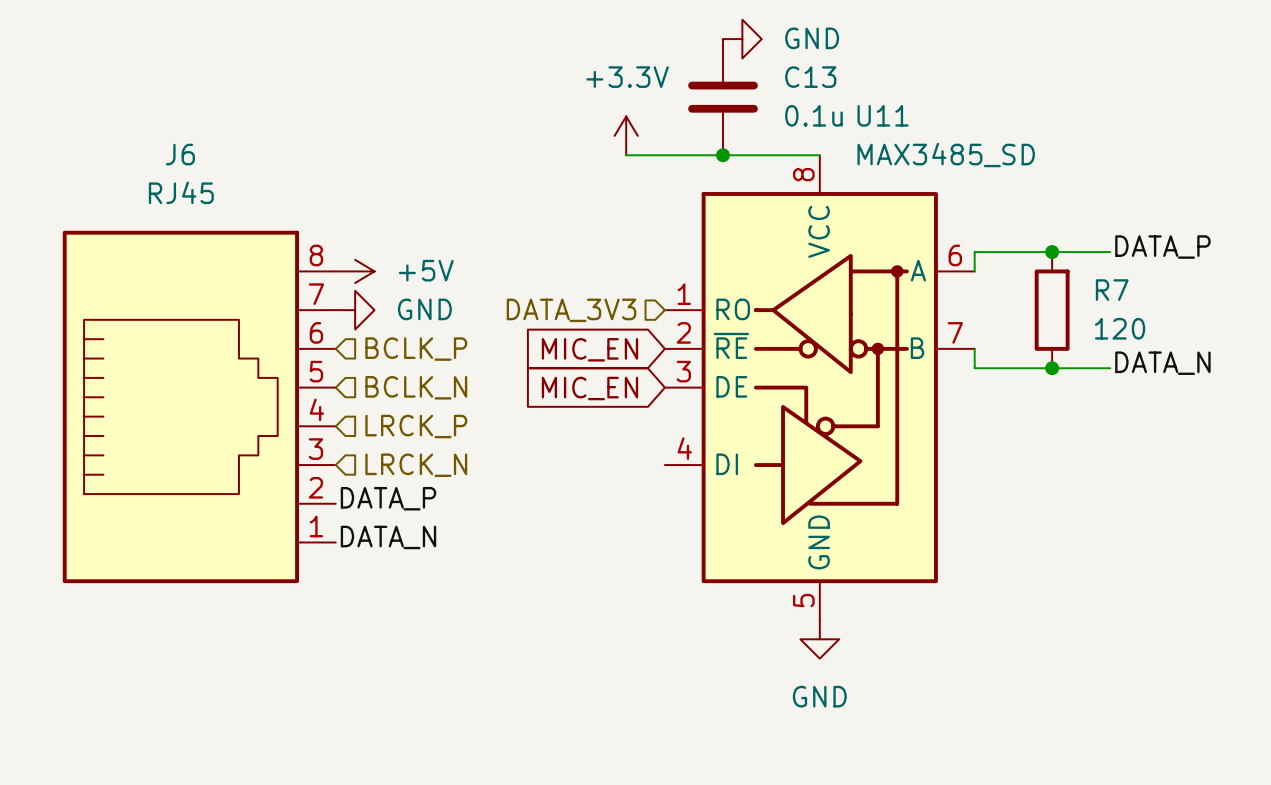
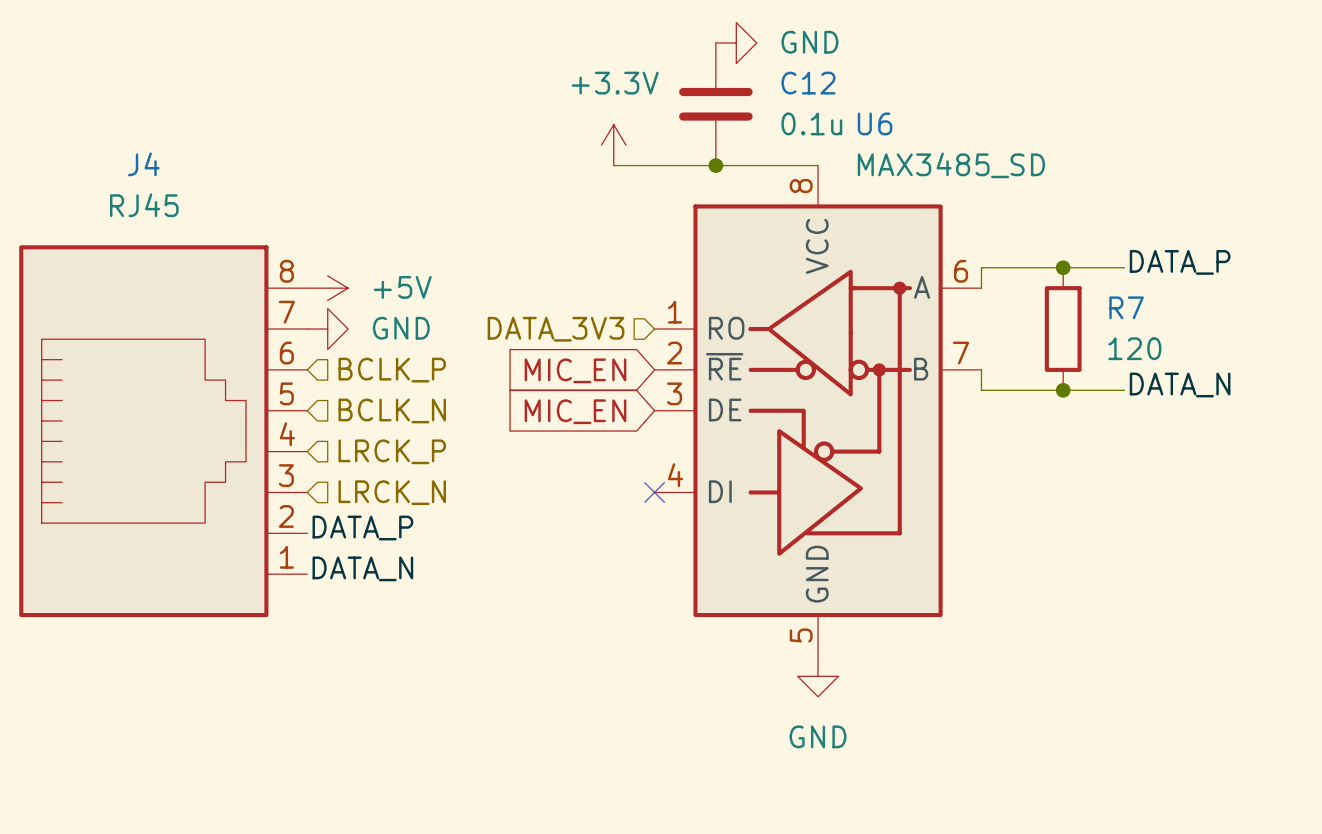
C13 name: C13 (810, 77) -> C12 (808, 83)
U11 name: U11 (883, 115) -> U6 (875, 123)
J6 name: J6 (180, 154) -> J4 (143, 164)
no-connect mark: none -> (654, 492)

